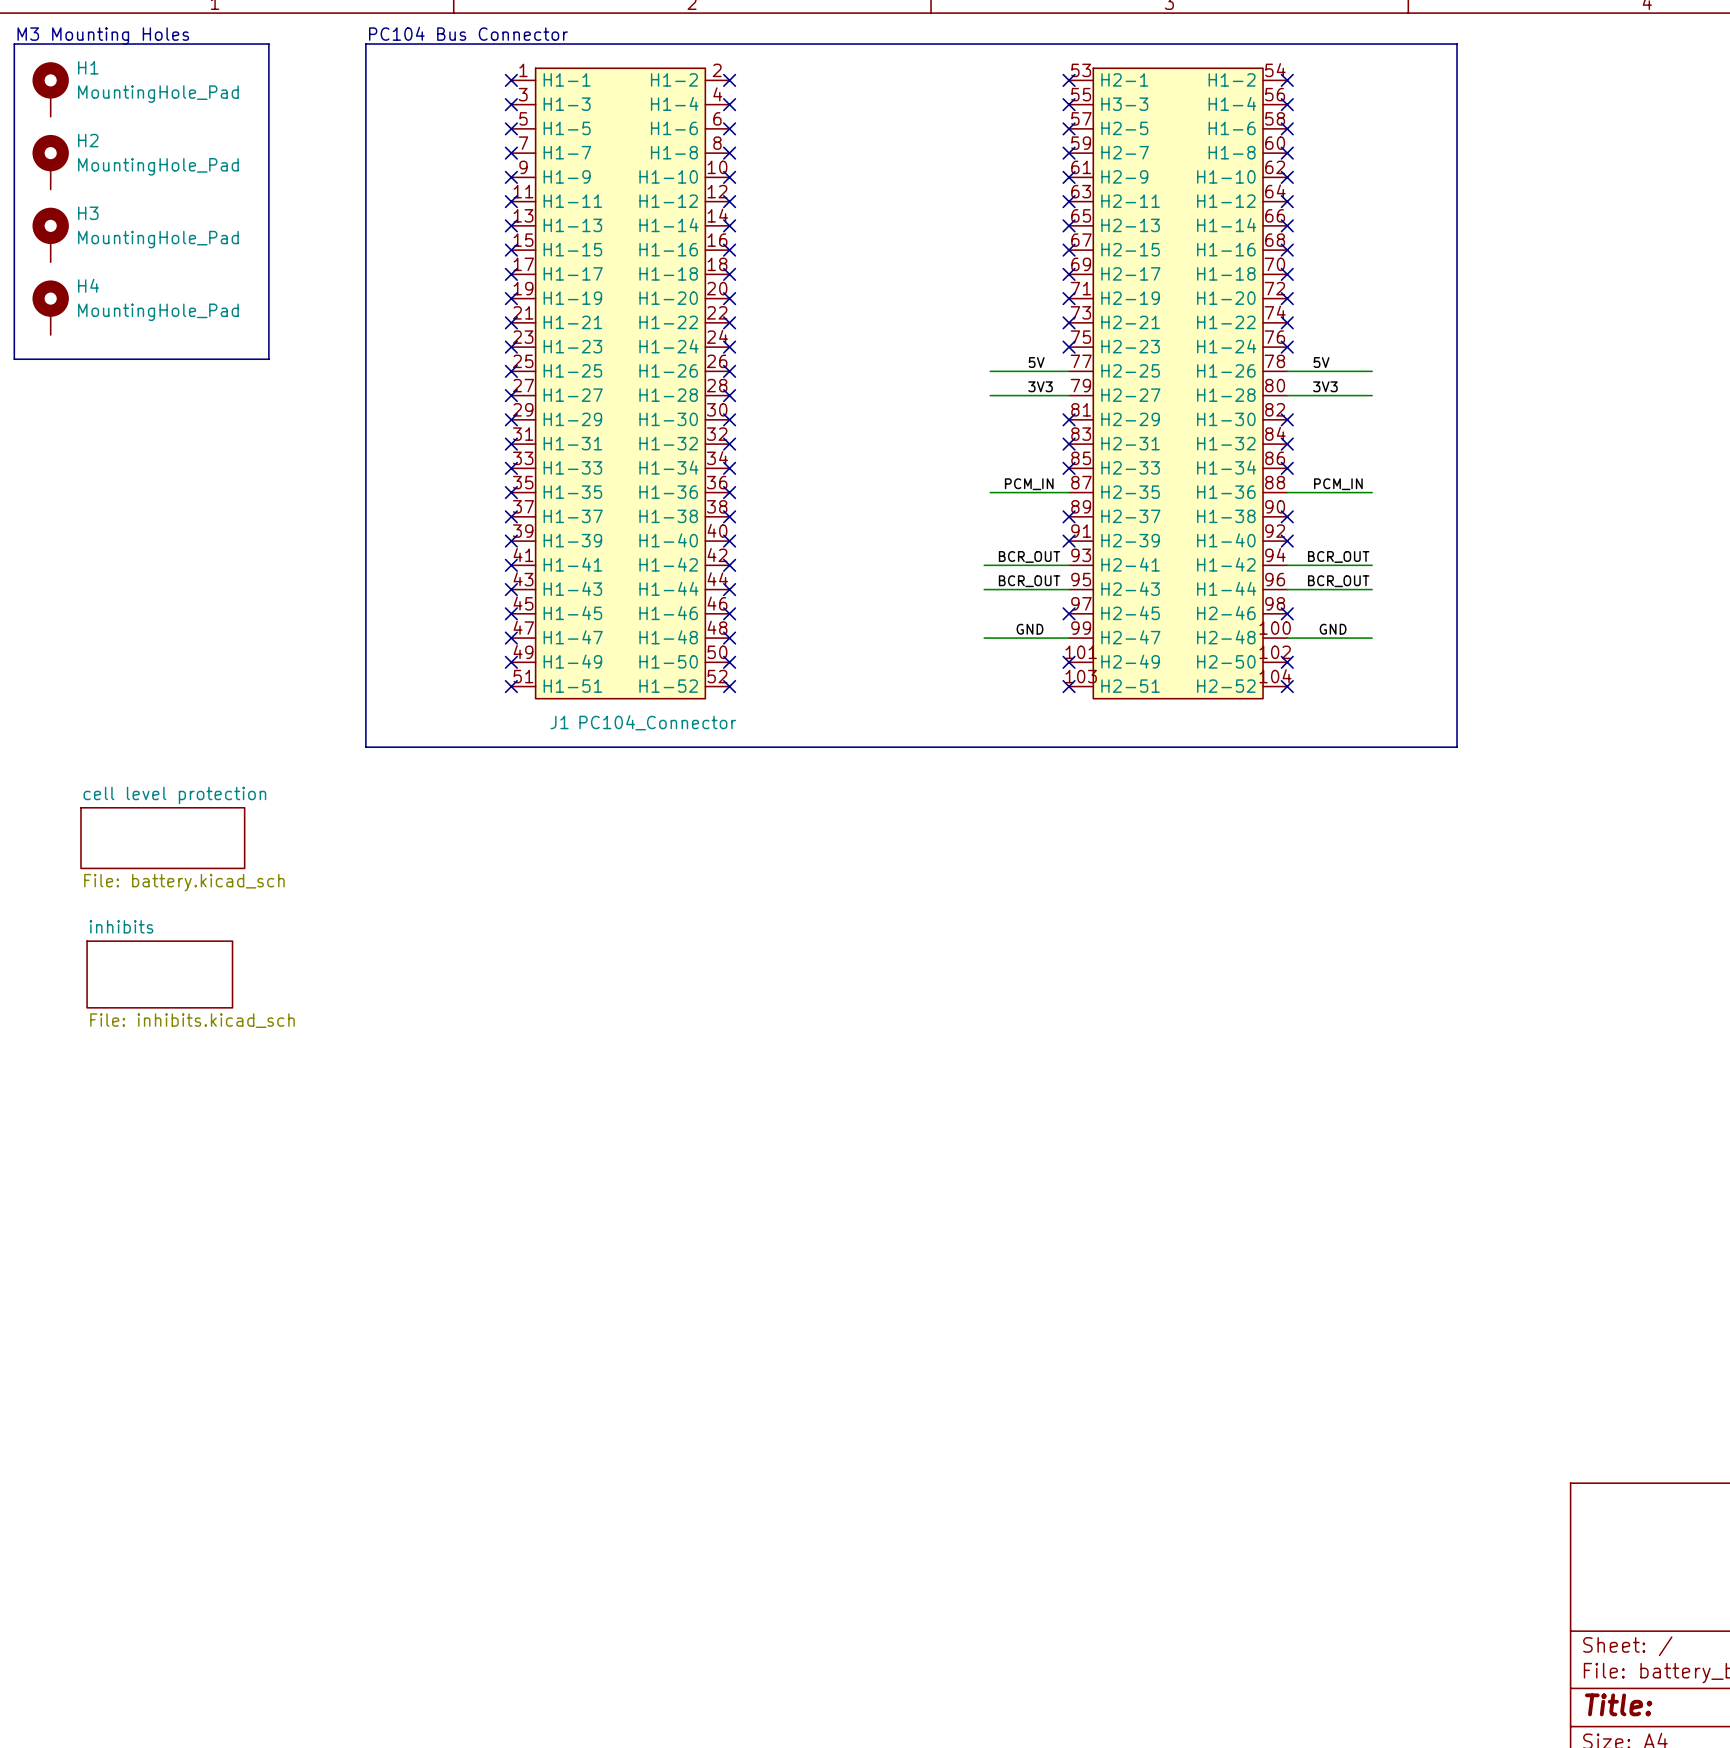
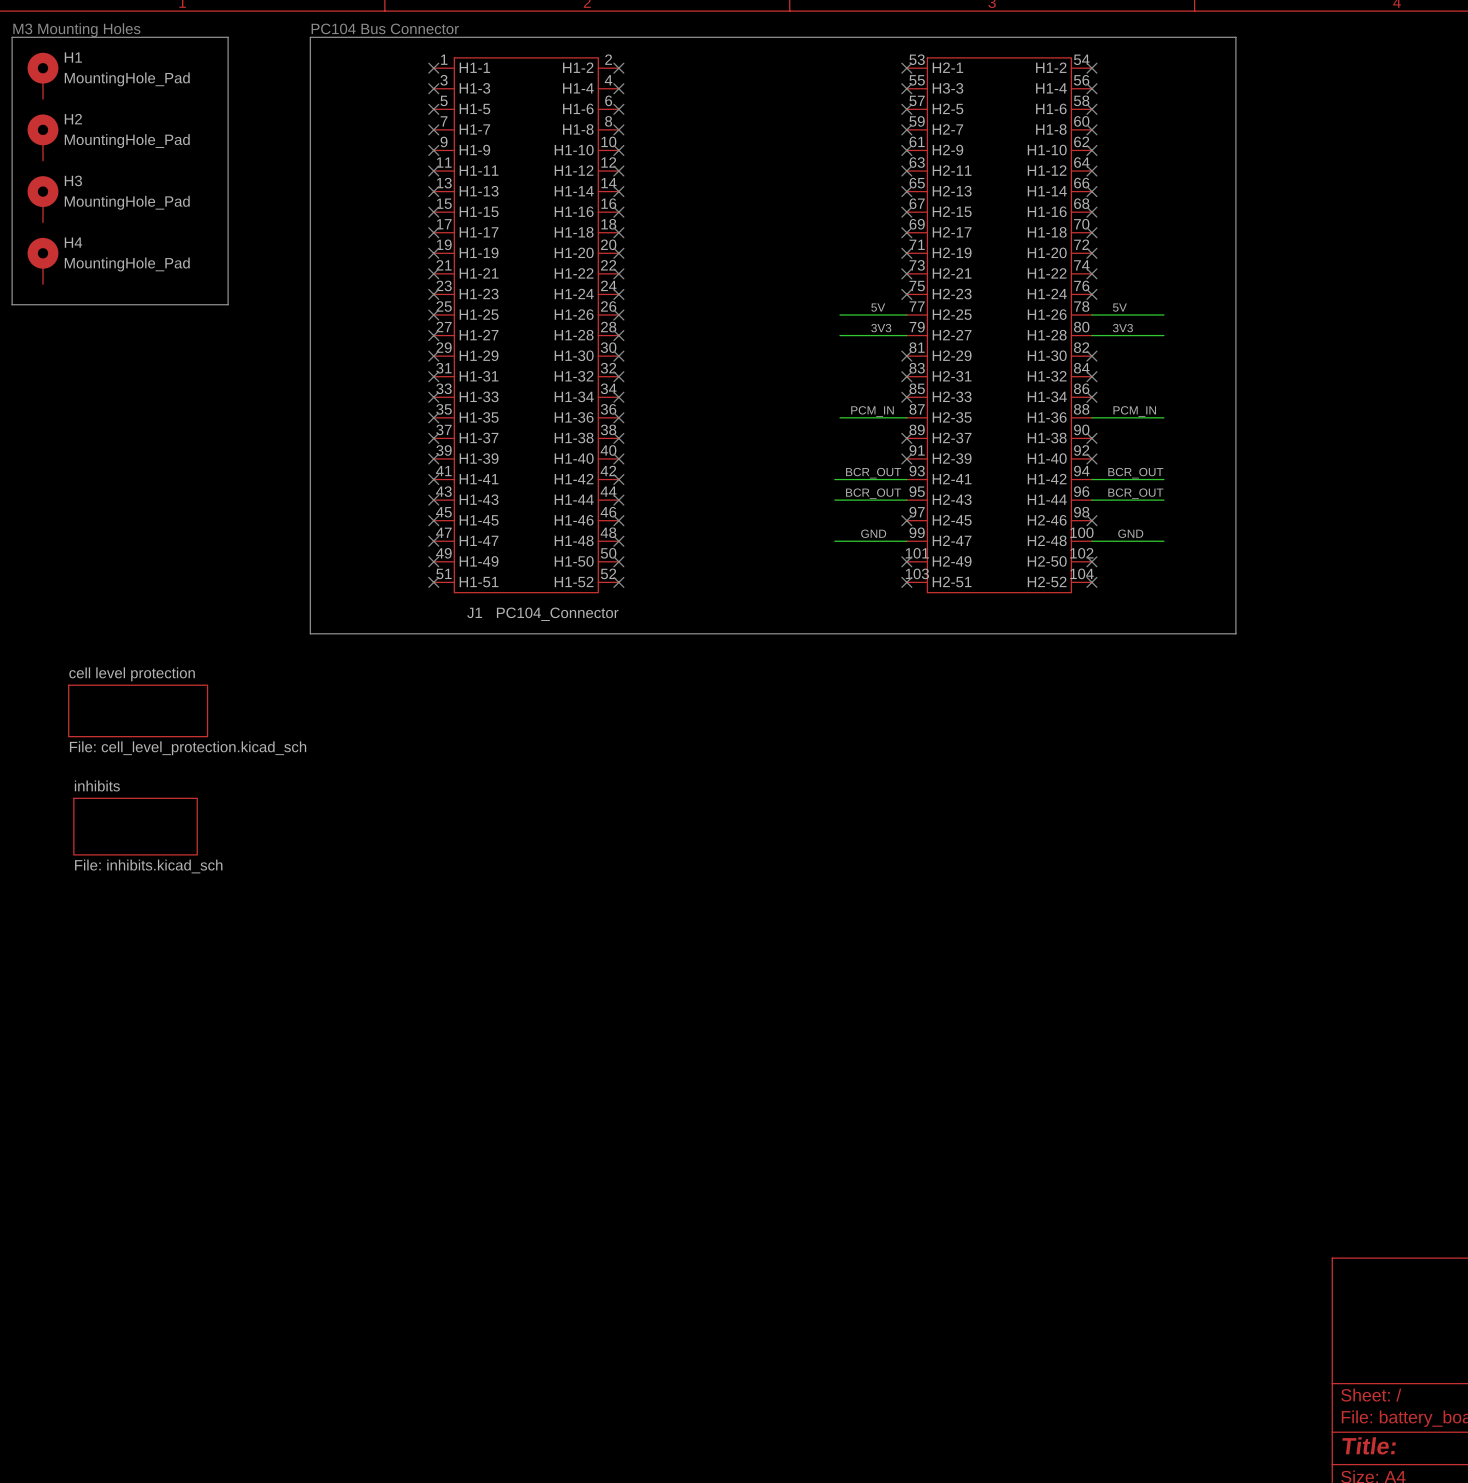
sheet cell level protection value: File: battery.kicad_sch (184, 882) -> File: cell_level_protection.kicad_sch (188, 748)

